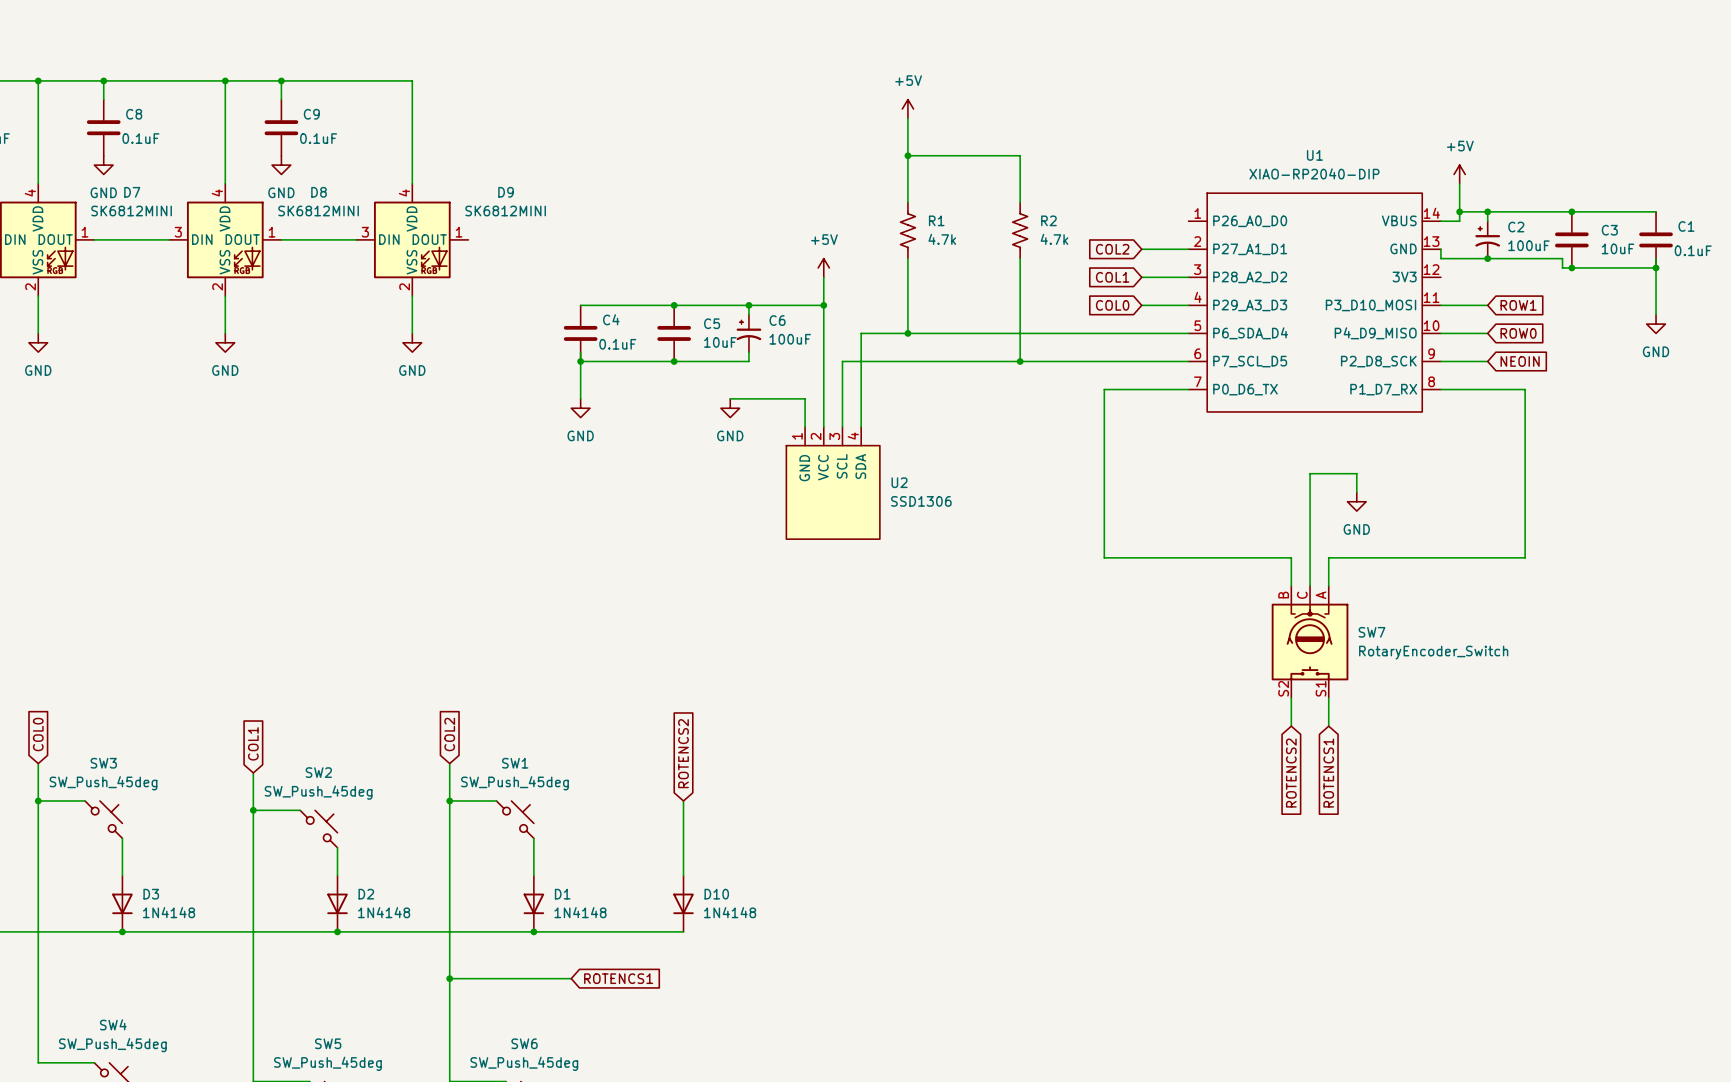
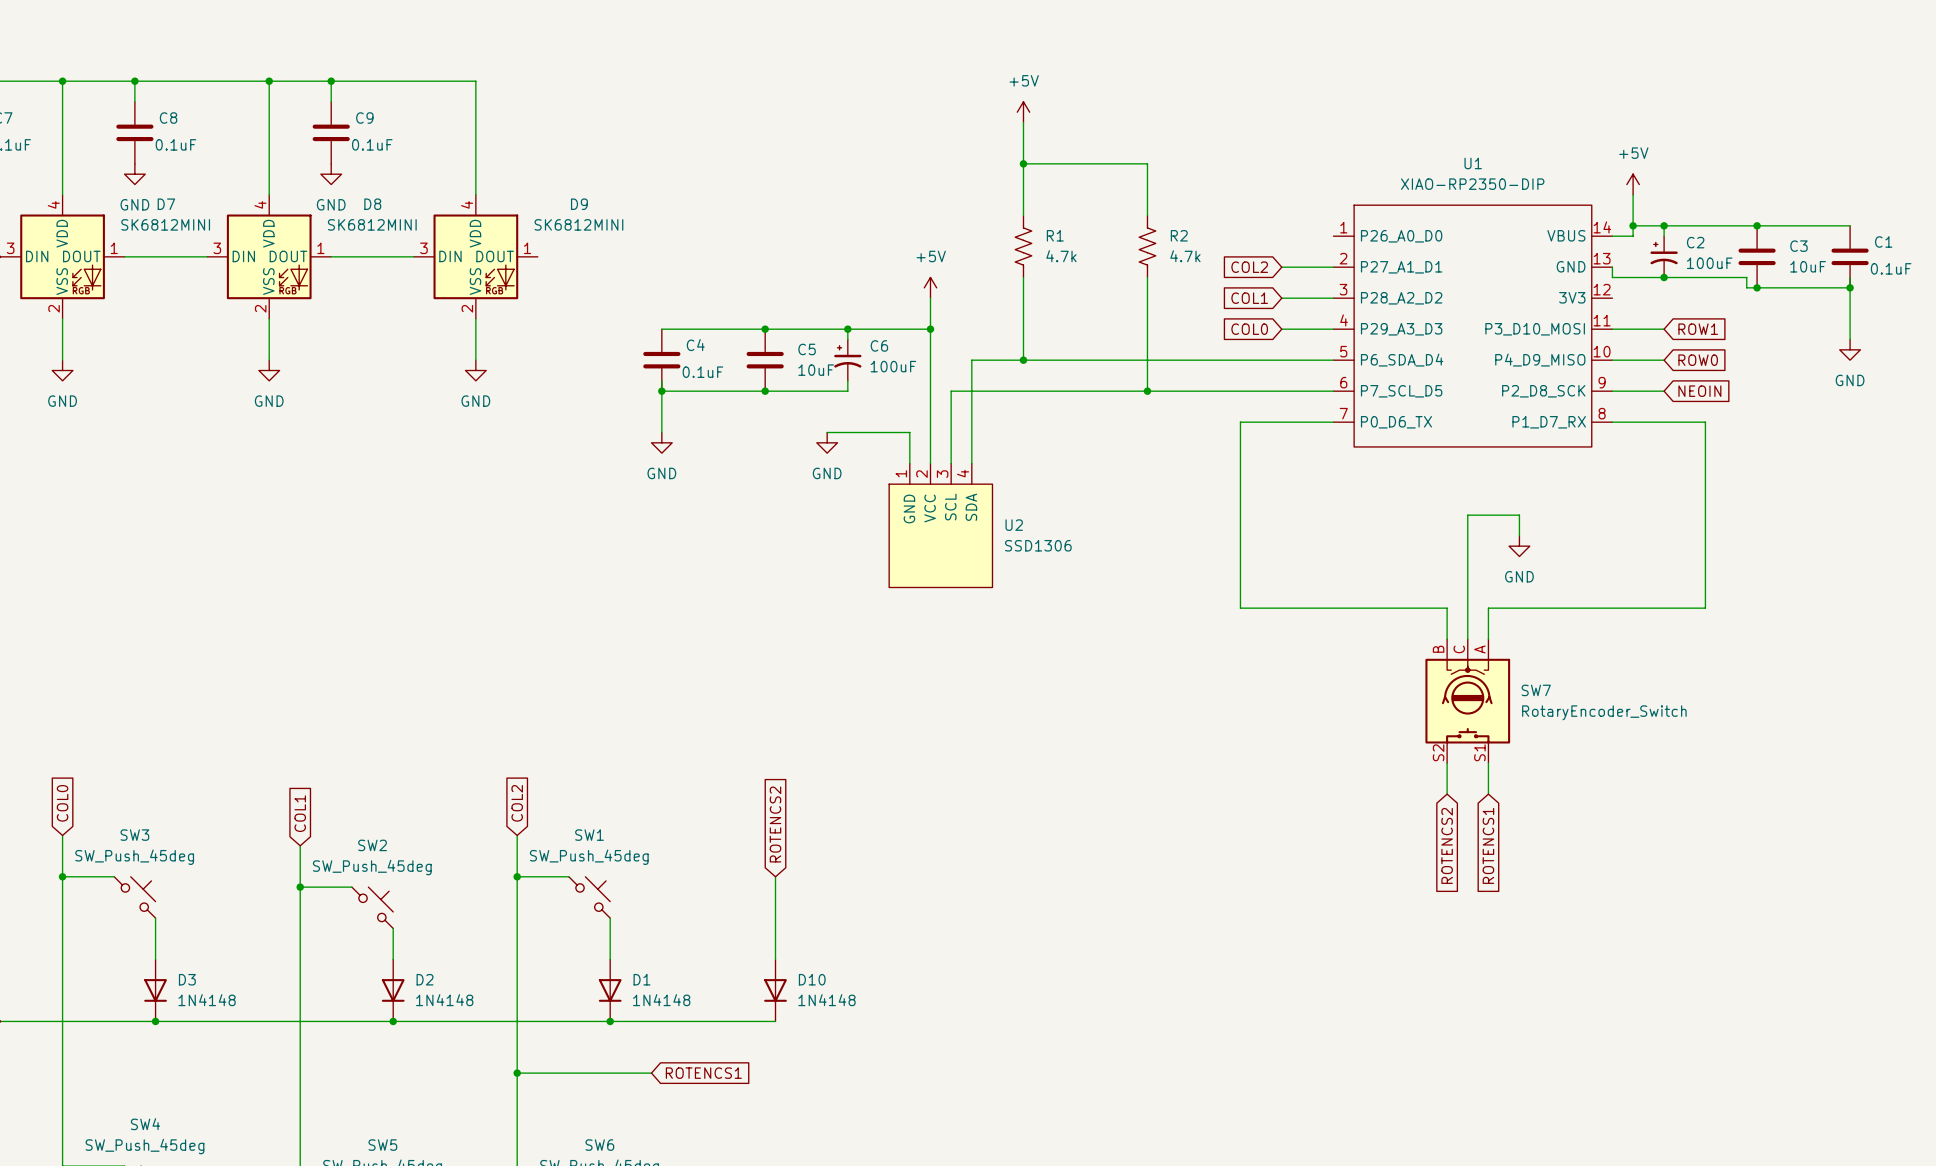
U1 value: XIAO-RP2040-DIP (1314, 173) -> XIAO-RP2350-DIP (1472, 184)

